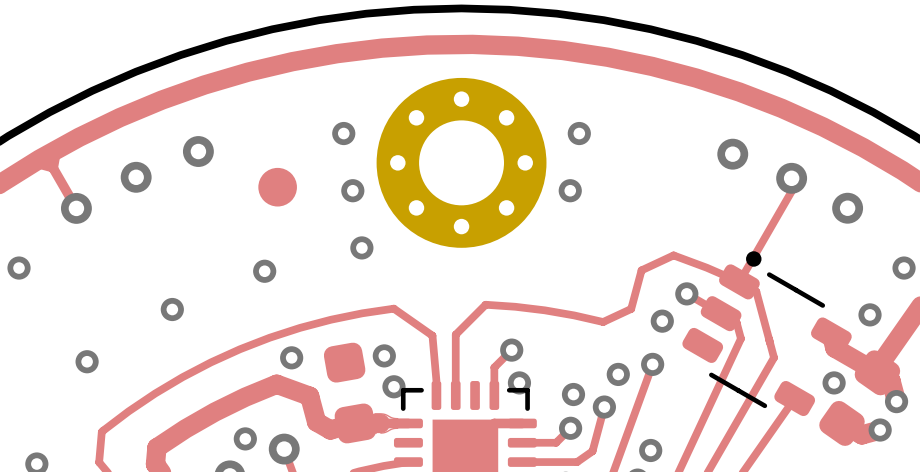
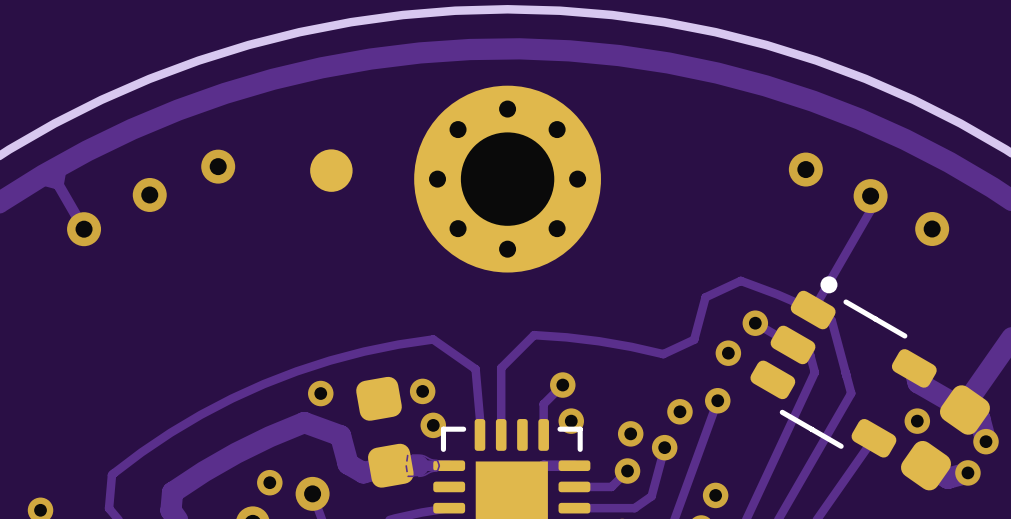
via: (343, 133) -> none
via: (579, 133) -> none
part position: (277, 187) -> (331, 170)
via: (352, 190) -> none
via: (570, 190) -> none
via: (361, 247) -> none
via: (19, 268) -> none
via: (904, 268) -> none
via: (264, 271) -> none
via: (172, 309) -> none
via: (870, 314) -> none
via: (87, 361) -> none

